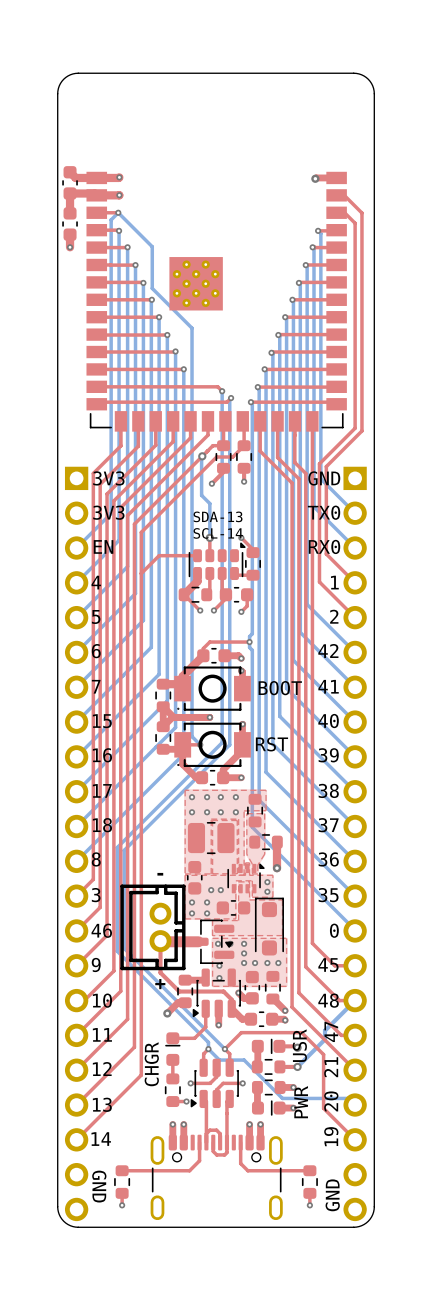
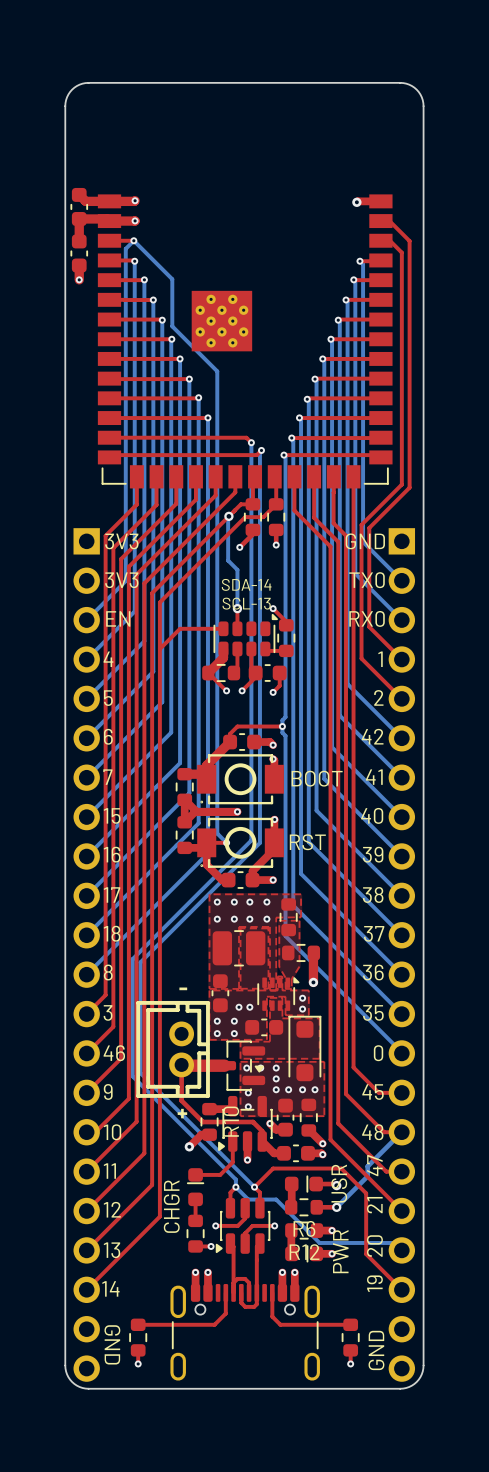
text: SDA-13 (218, 516) -> SDA-14 (246, 584)
text: SCL-14 (218, 533) -> SCL-13 (246, 603)
R10 name: none -> R10 (231, 1121)
R6 name: none -> R6 (304, 1228)
R12 name: none -> R12 (304, 1252)

